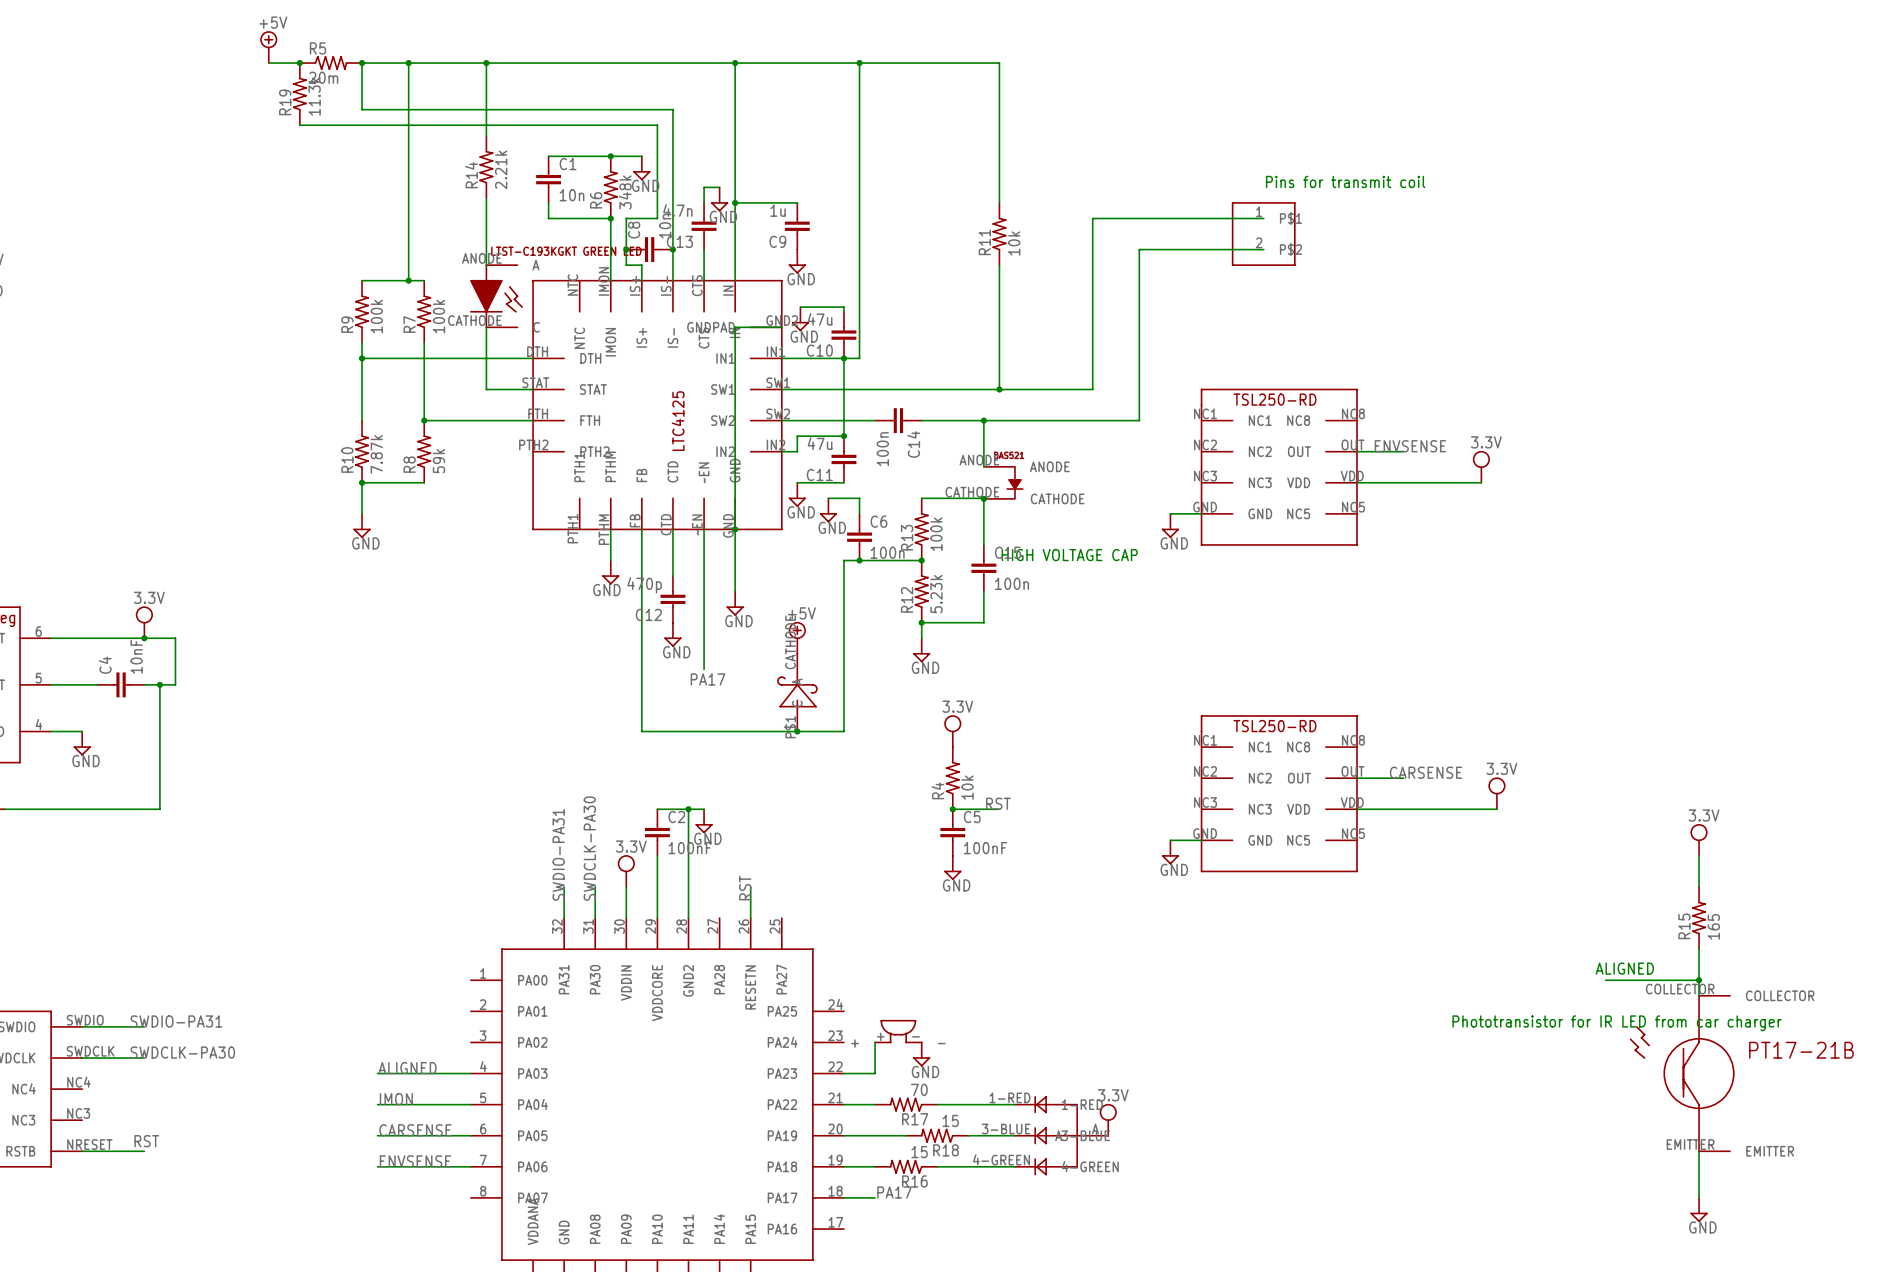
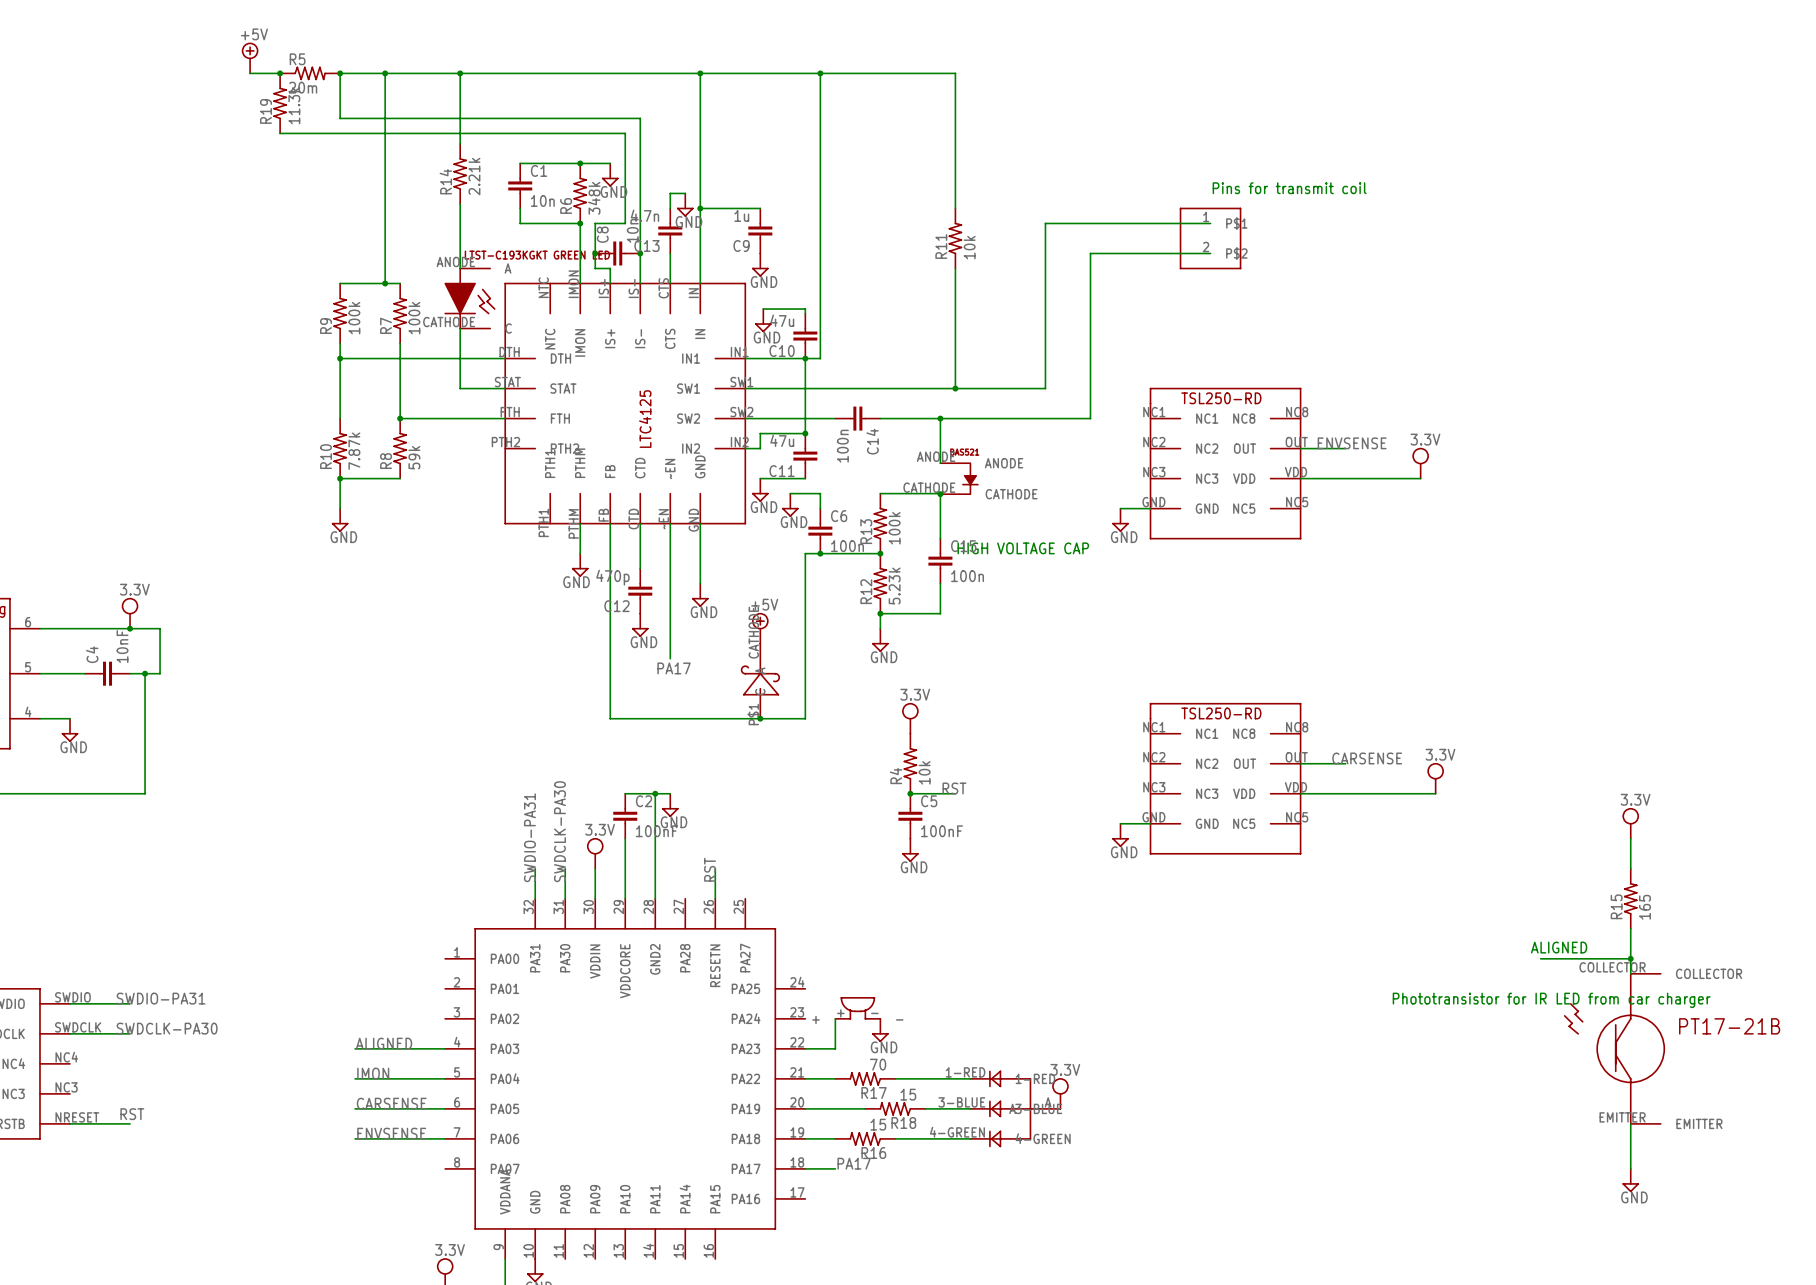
part symbol: [532, 279, 783, 531] -> [504, 282, 747, 525]
wire: (781, 327) (735, 327) (735, 529) -> none
junction: (735, 529) -> none

